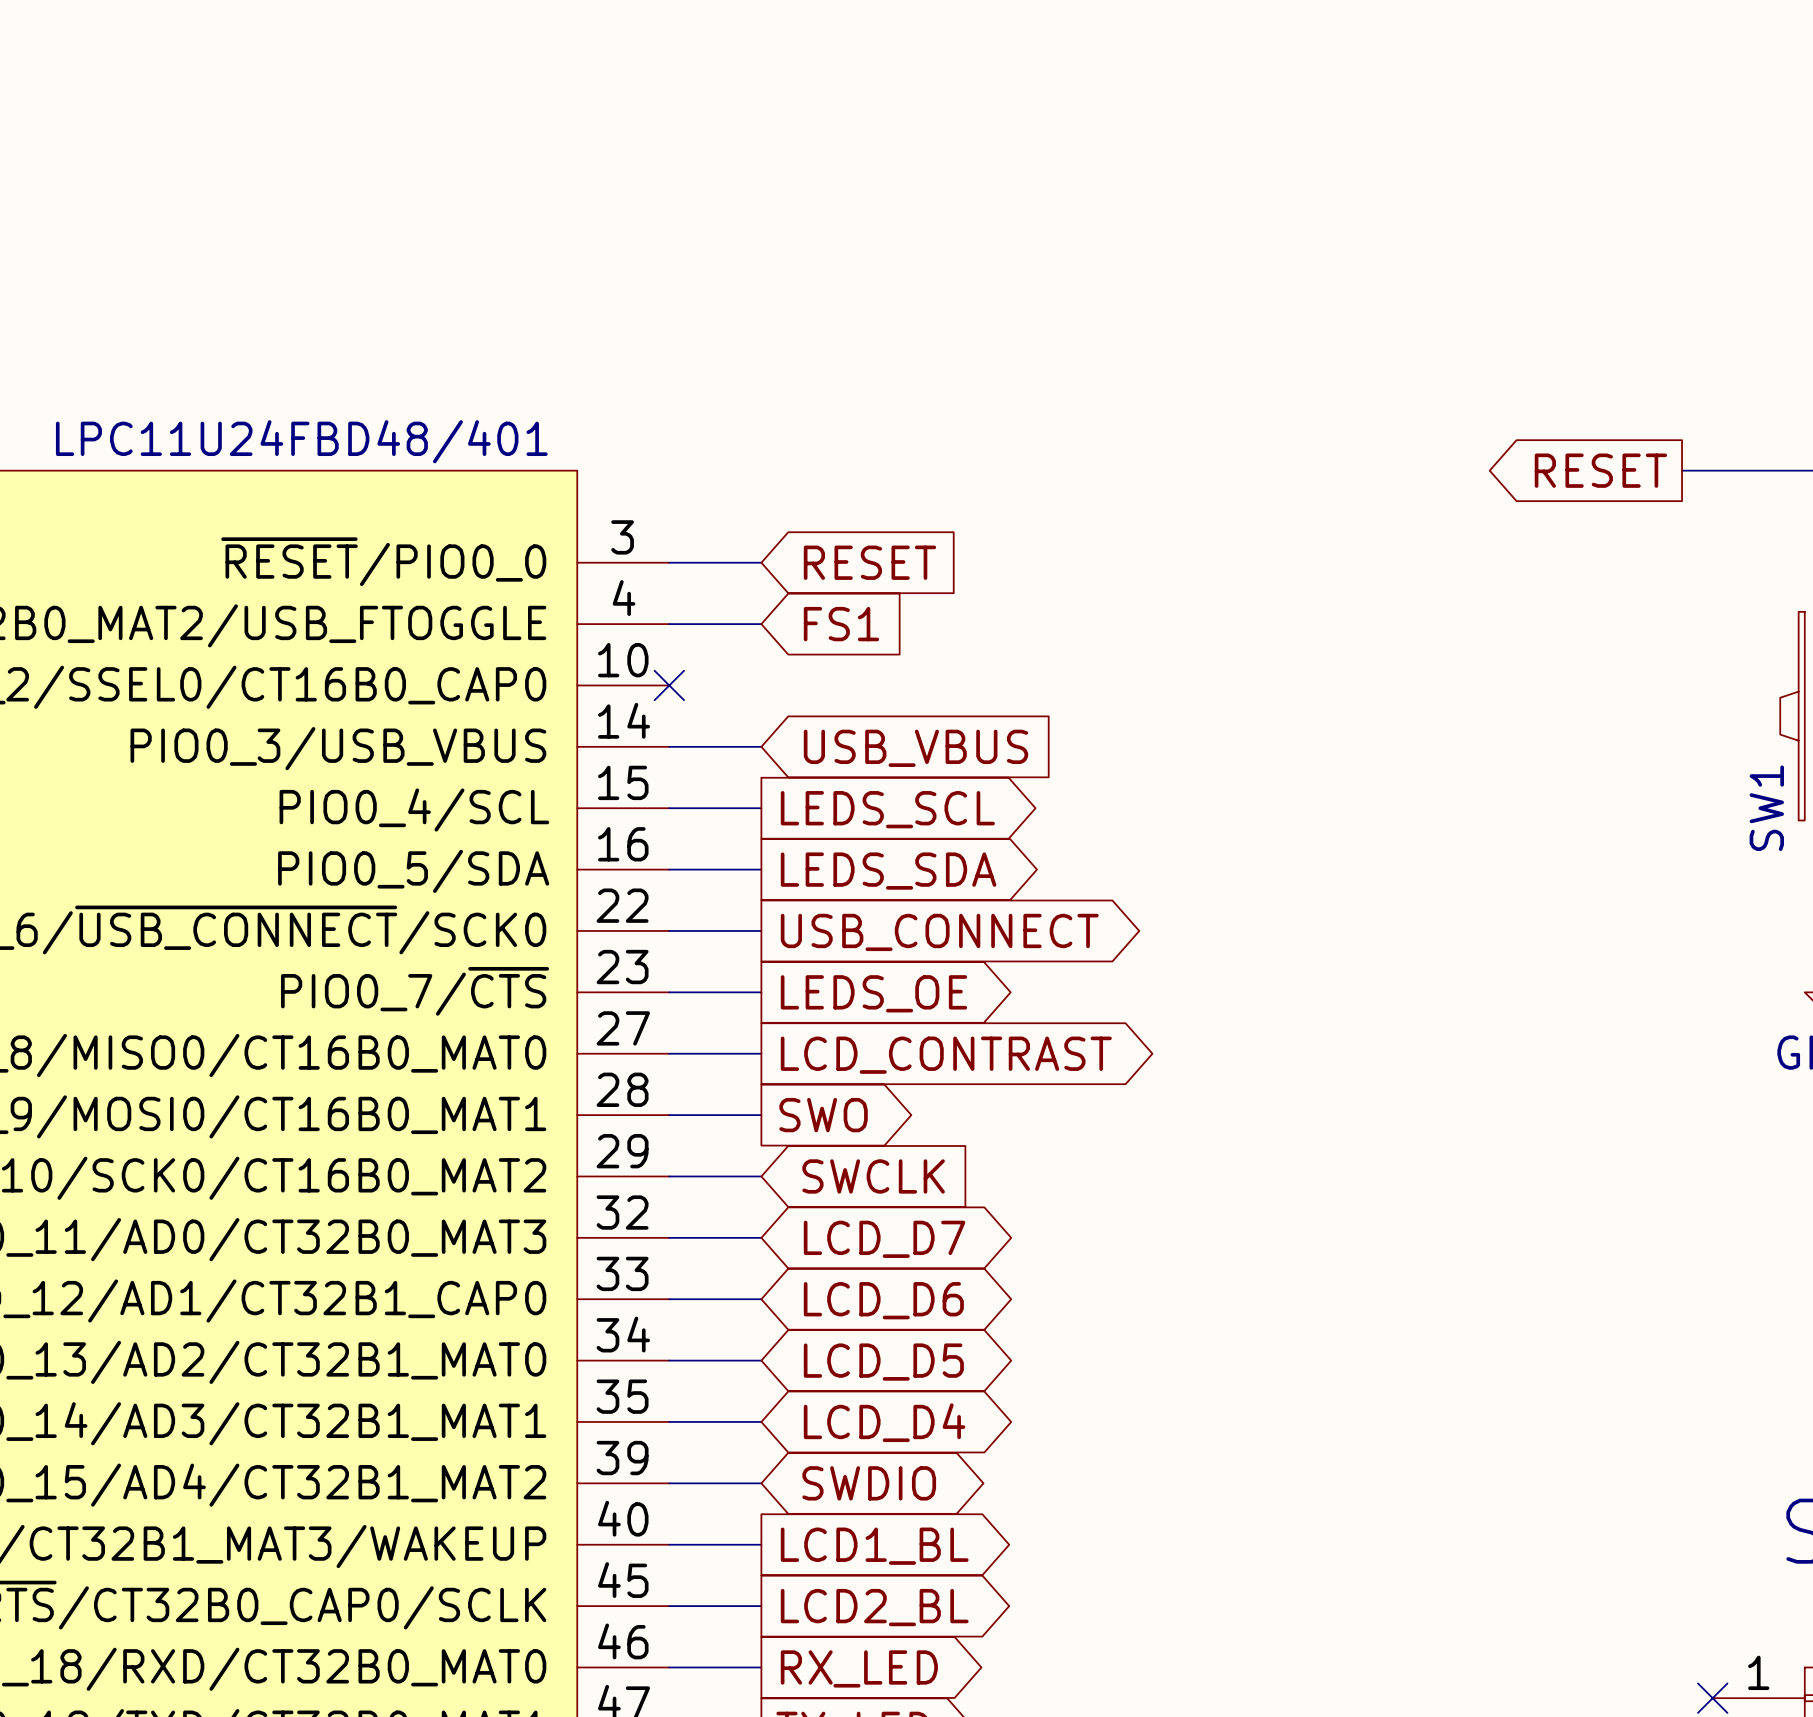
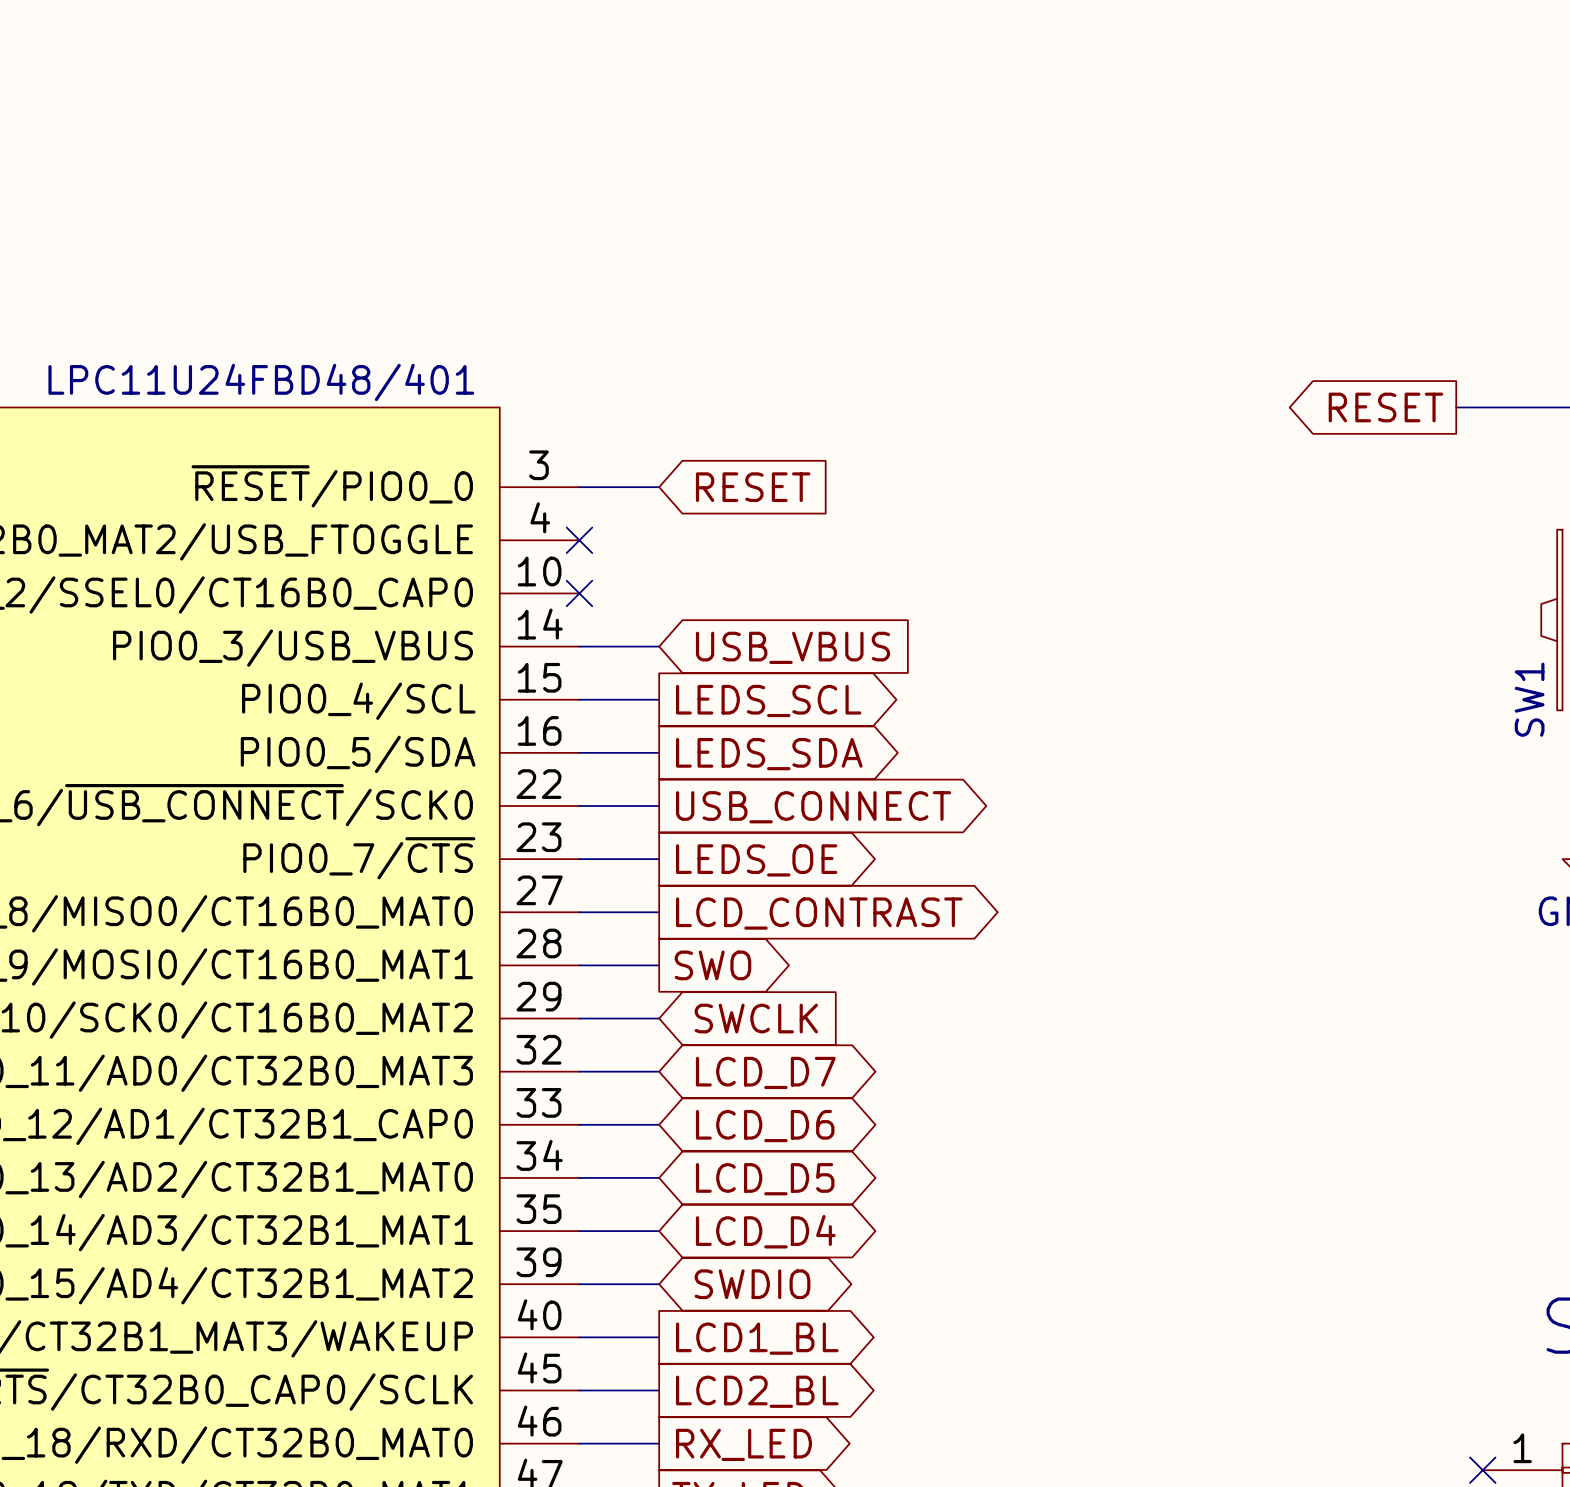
wire: (669, 624) (761, 624) -> none
no-connect mark: none -> (579, 540)
global label: FS1 (841, 624) -> none

